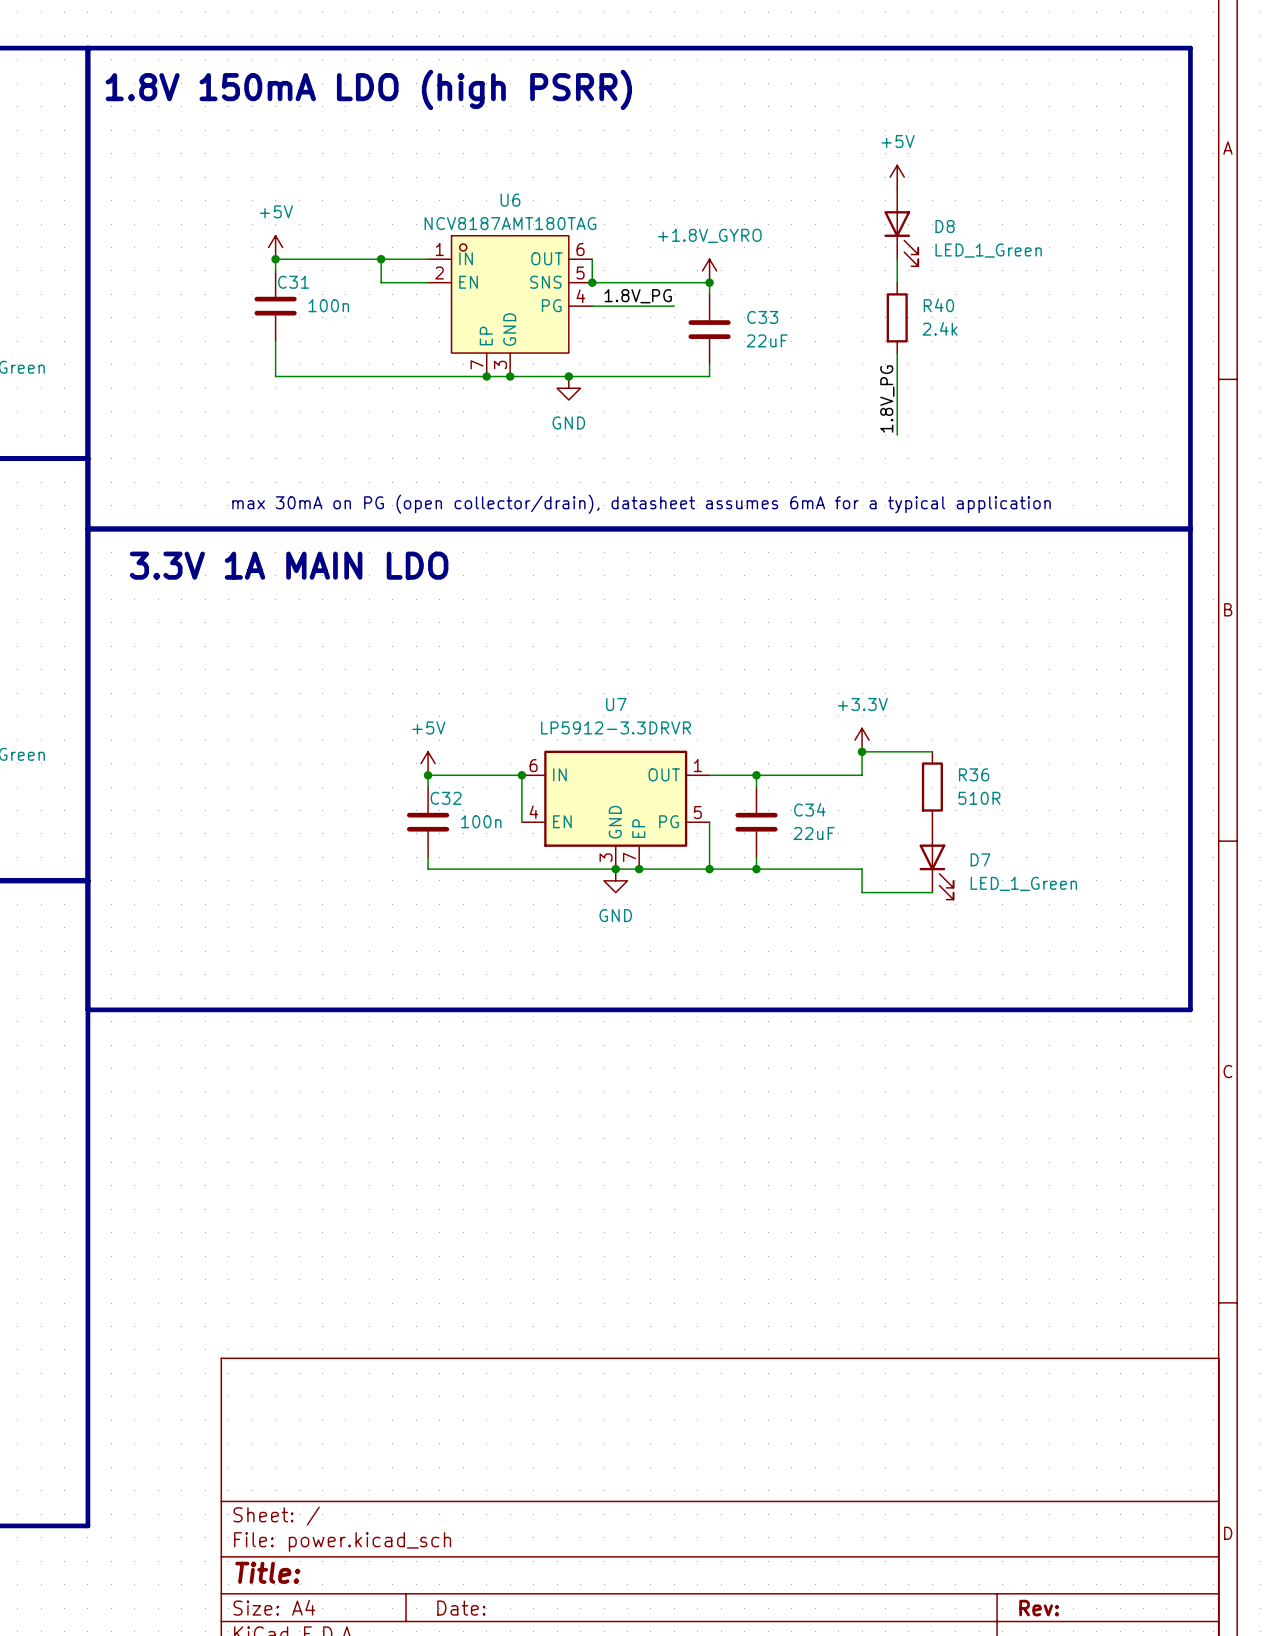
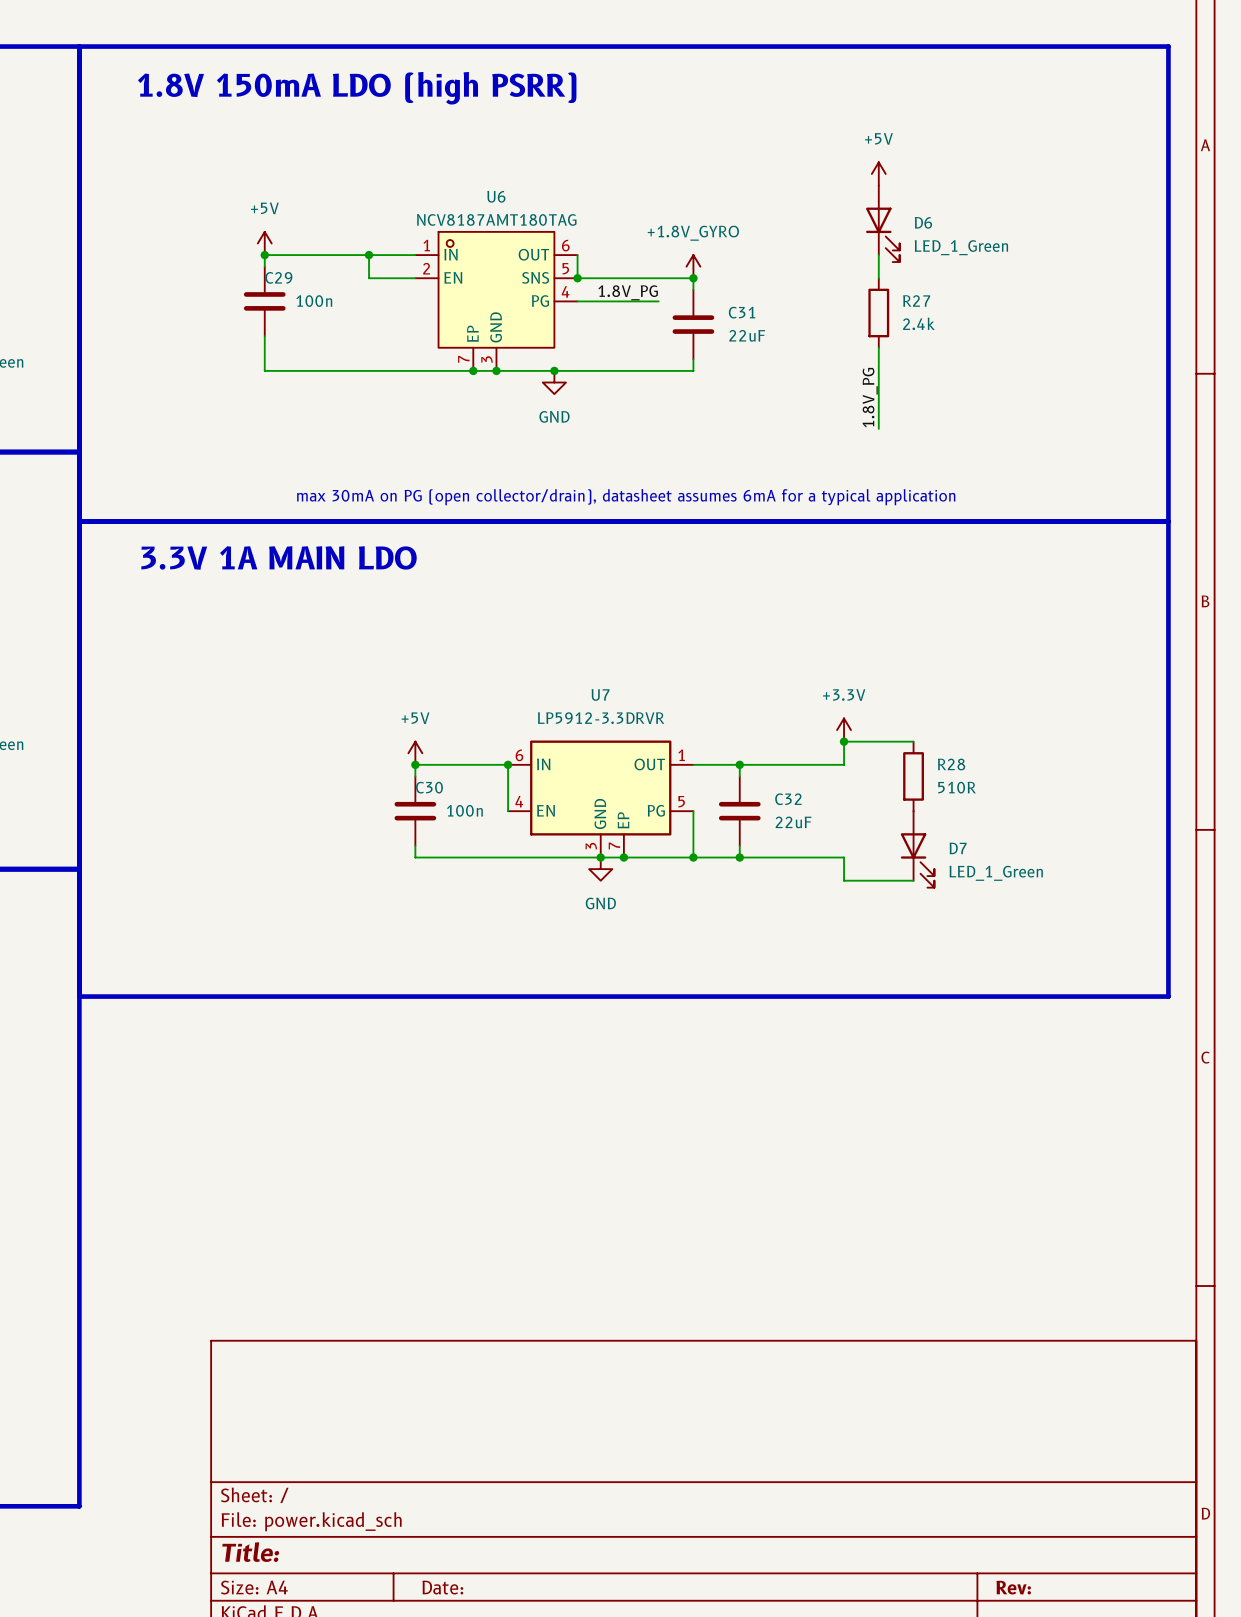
D8 name: D8 (945, 226) -> D6 (923, 222)
C31 name: C31 (293, 282) -> C29 (278, 277)
R40 name: R40 (938, 305) -> R27 (916, 300)
C33 name: C33 (762, 317) -> C31 (742, 312)
R36 name: R36 (974, 774) -> R28 (951, 764)
C32 name: C32 (446, 798) -> C30 (429, 787)
C34 name: C34 (809, 809) -> C32 (788, 799)

